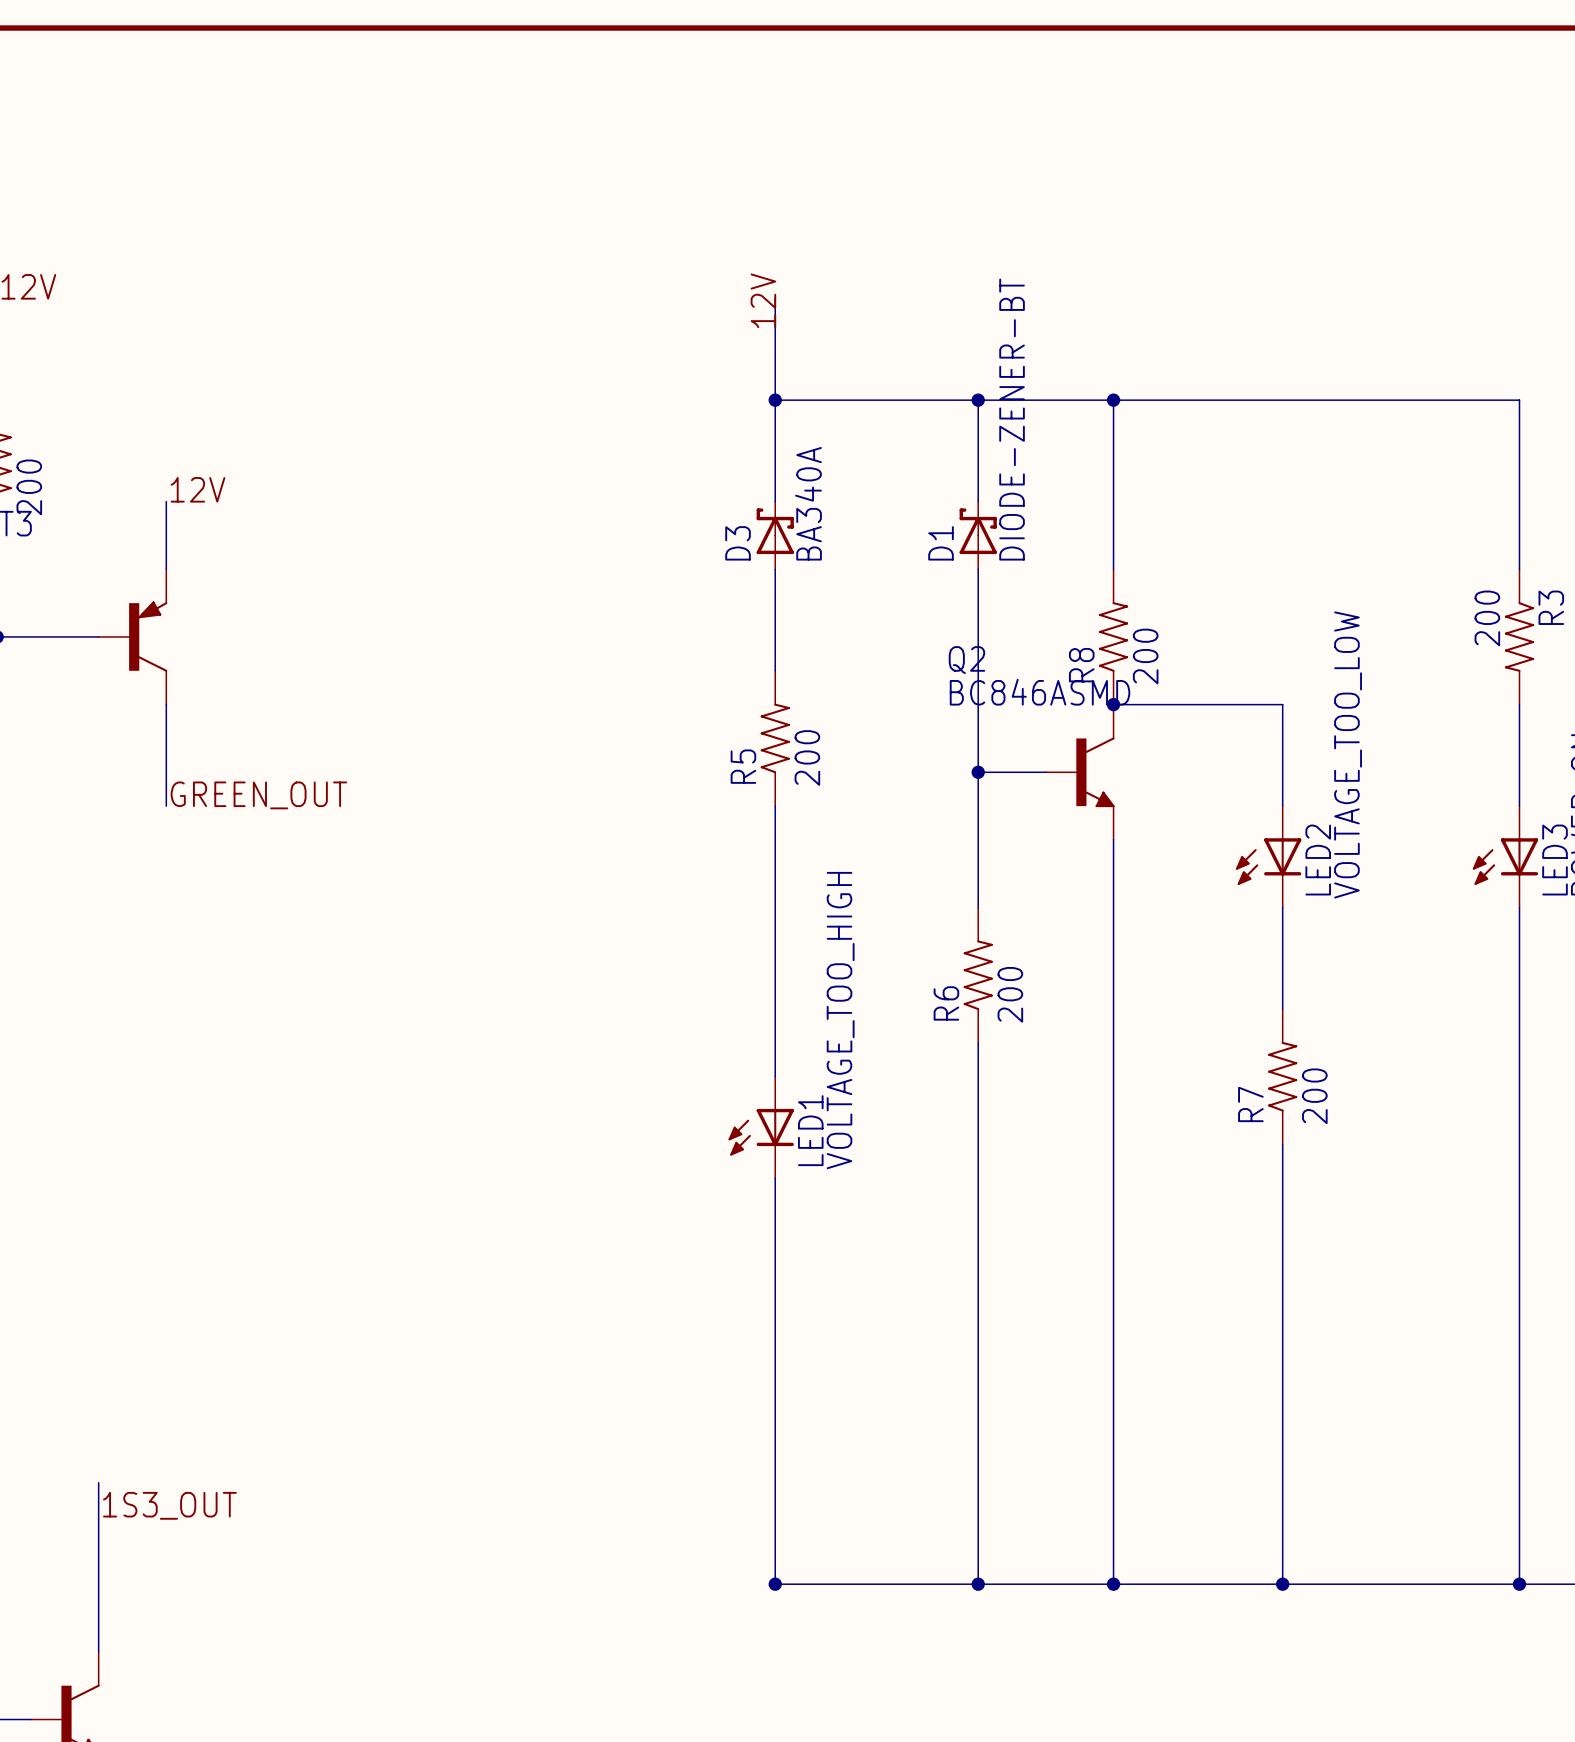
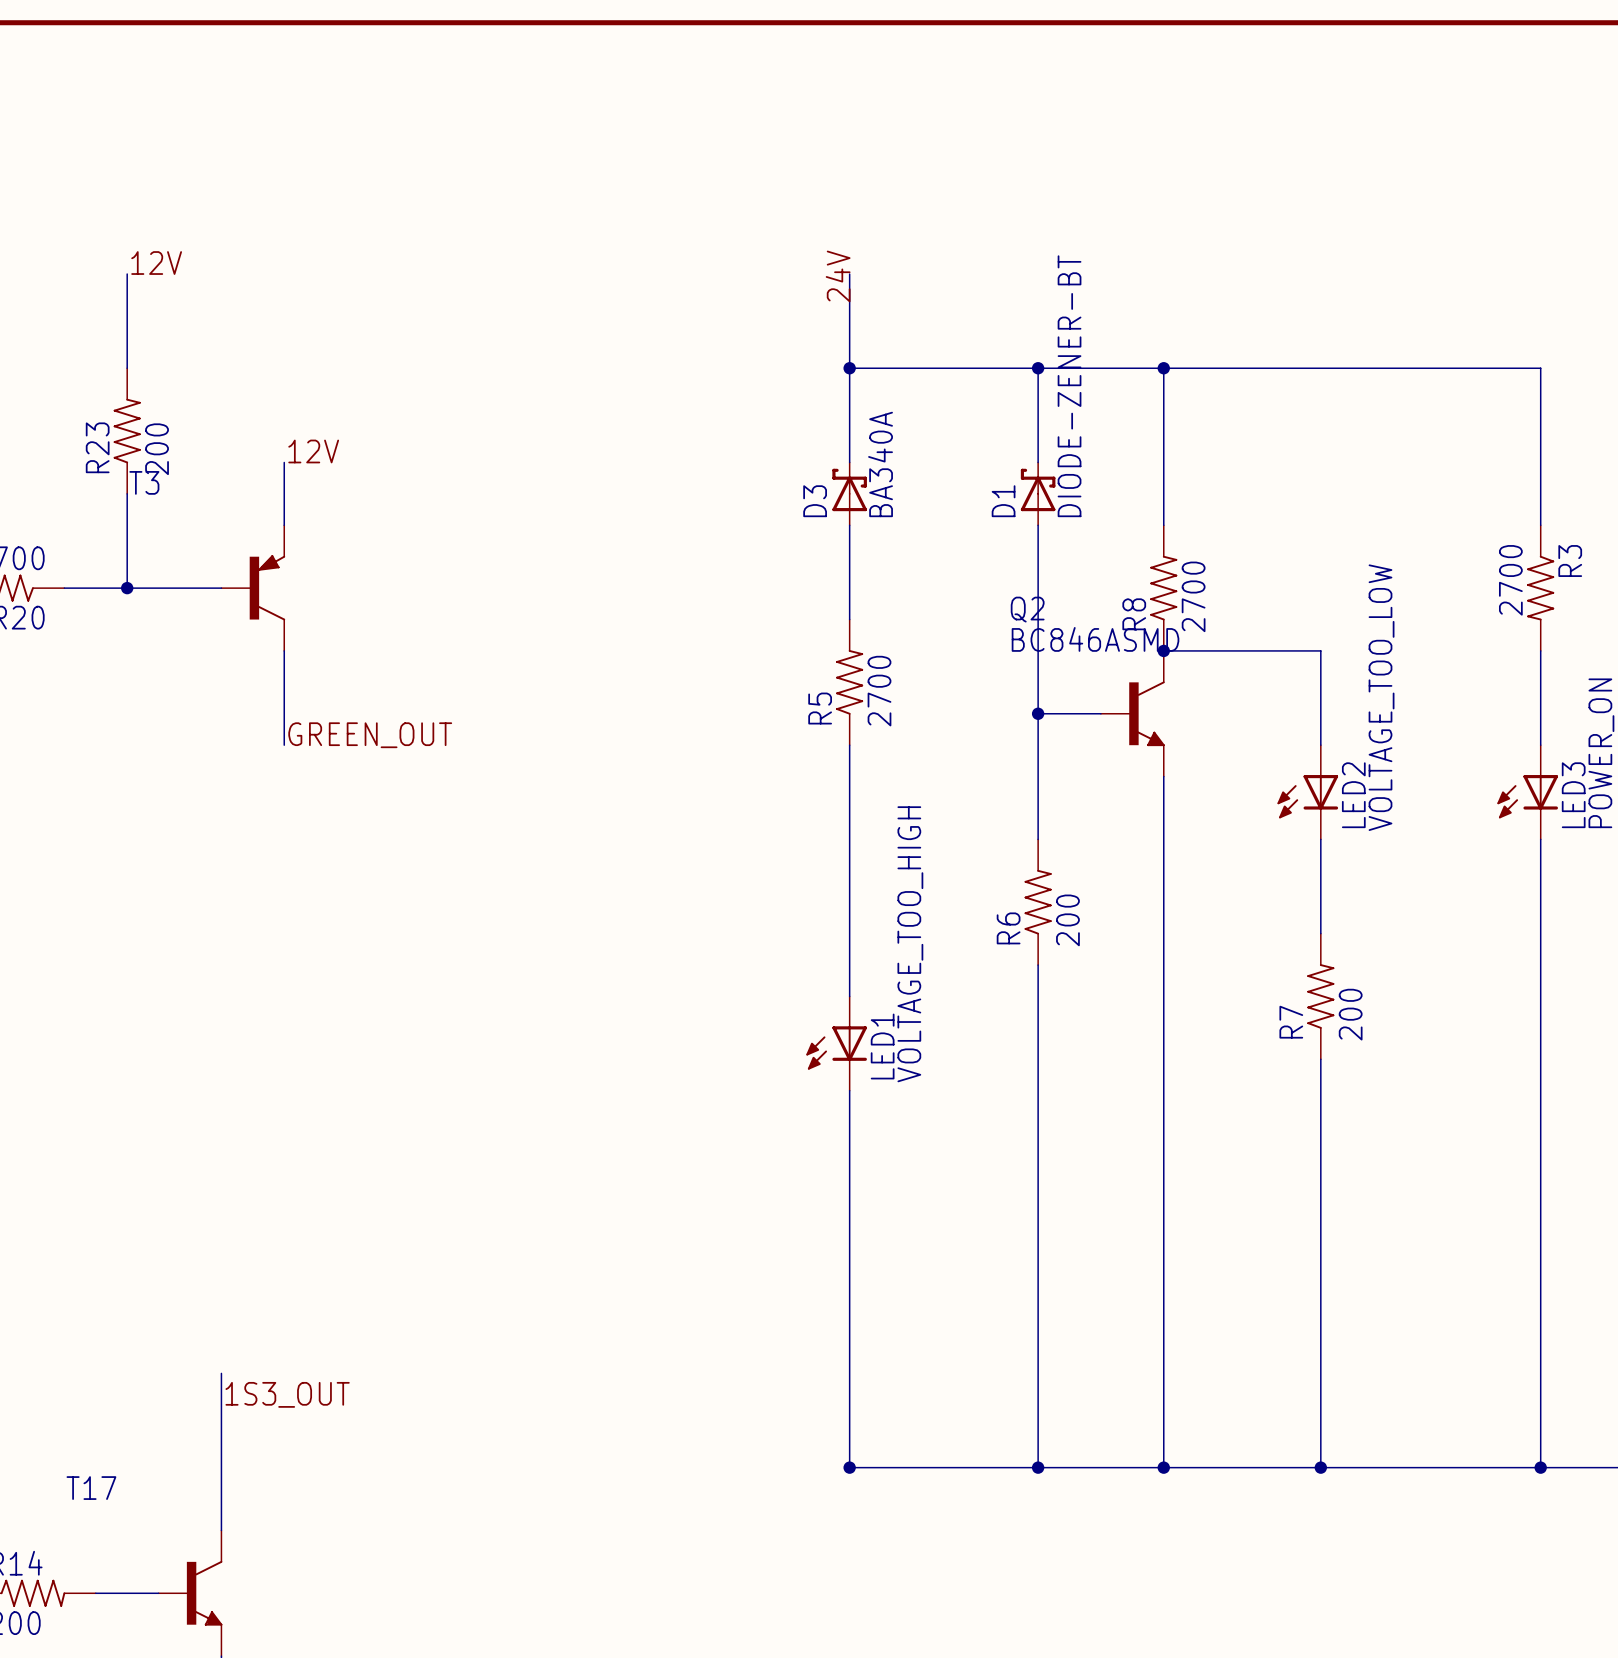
label: 12V (763, 300) -> 24V (838, 276)
R3 value: 200 (1487, 618) -> 2700 (1510, 580)
R8 value: 200 (1145, 656) -> 2700 (1193, 596)
R5 value: 200 (807, 758) -> 2700 (879, 691)

